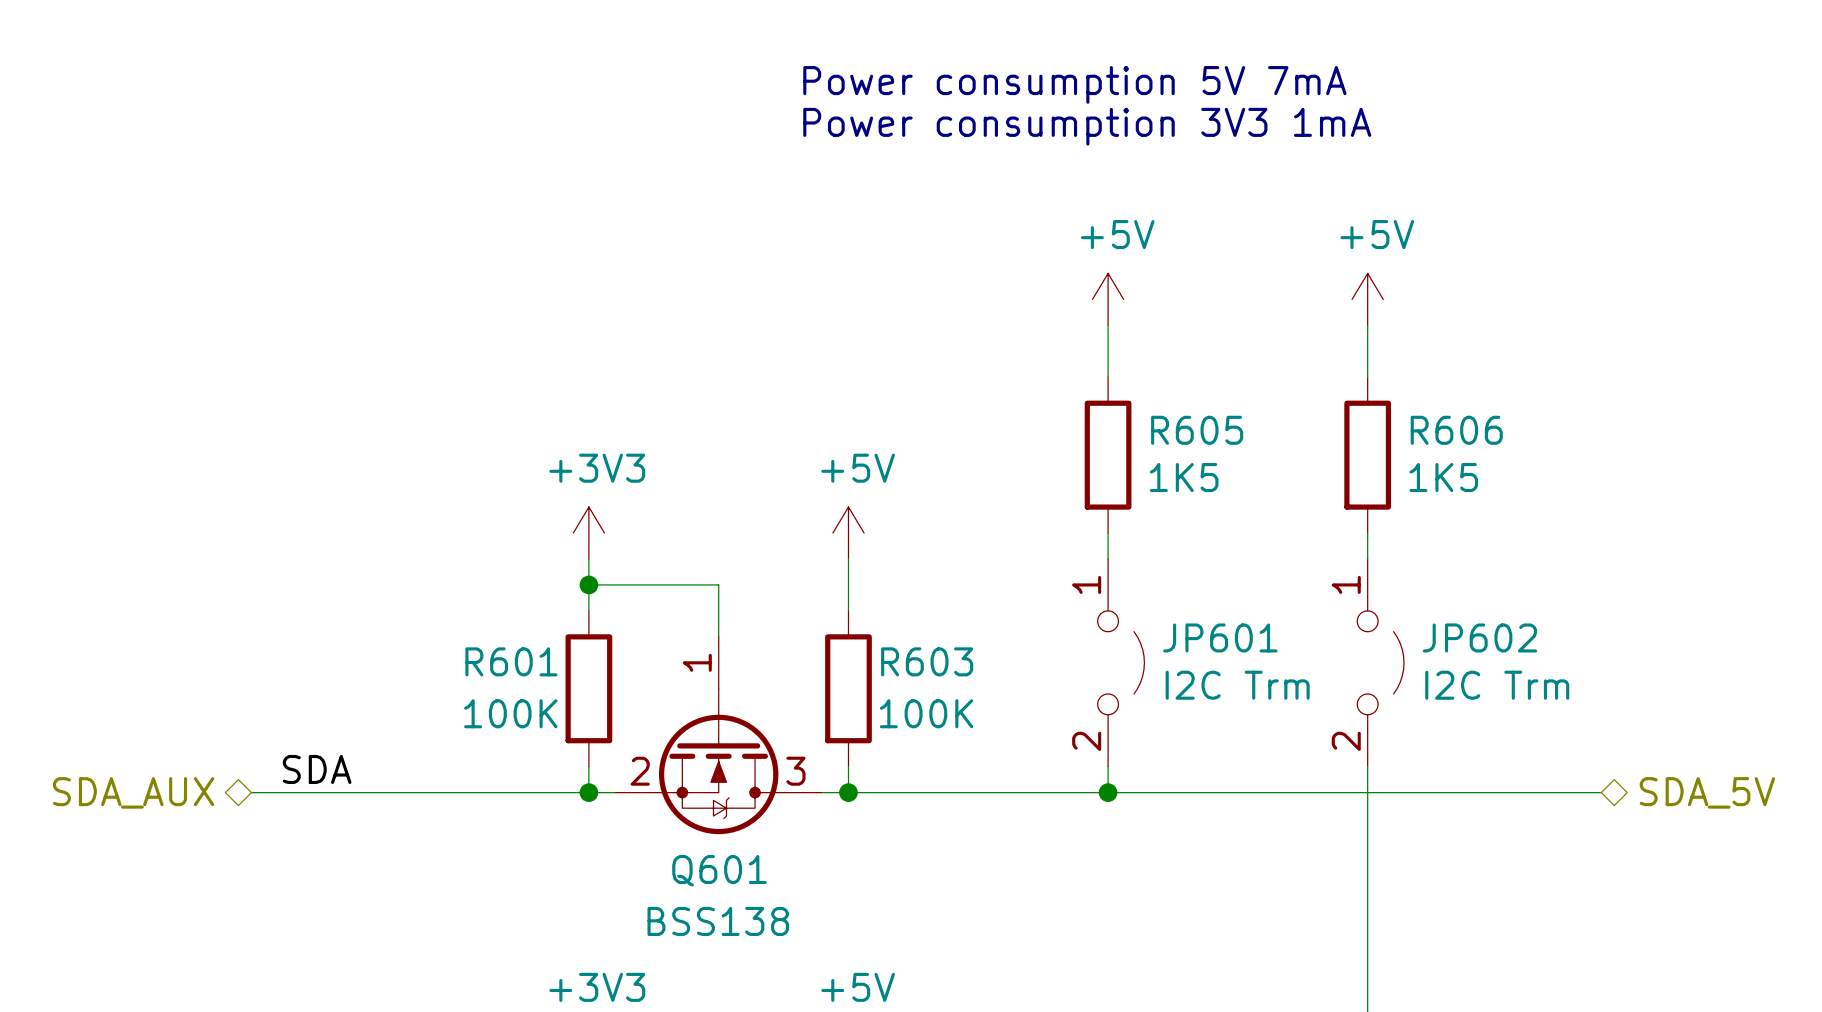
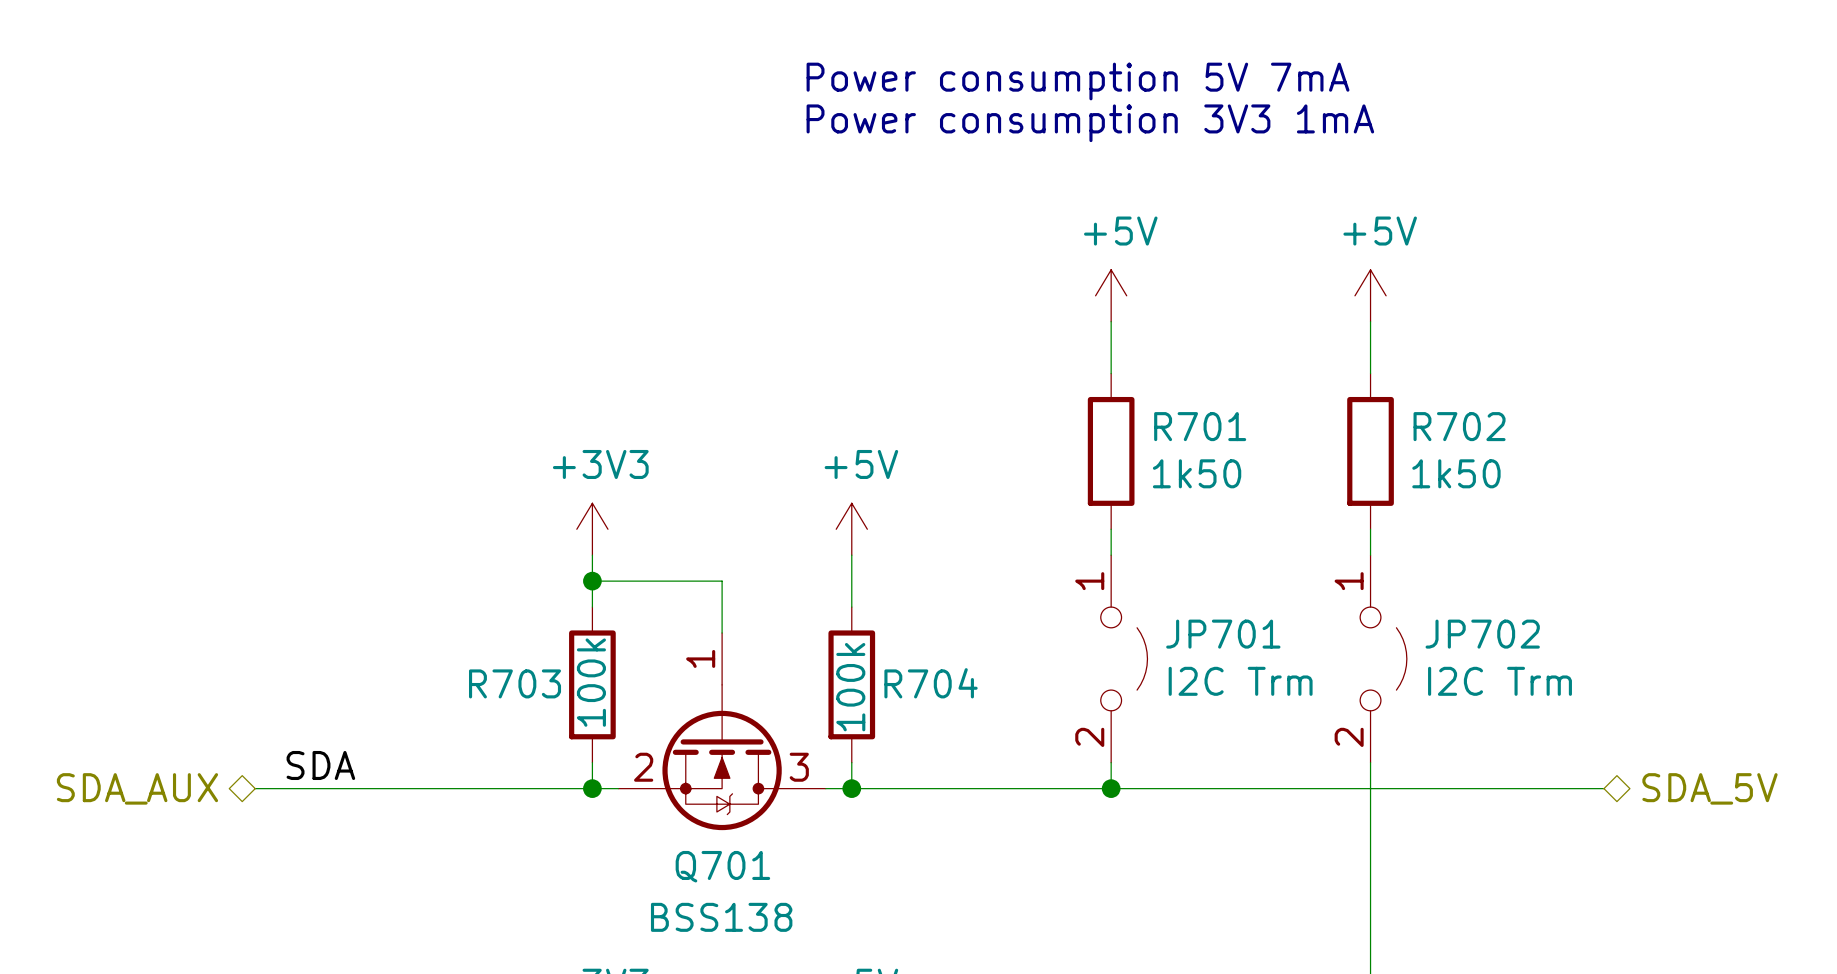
R605 name: R605 (1197, 430) -> R701 (1200, 426)
R606 name: R606 (1456, 430) -> R702 (1459, 426)
R605 value: 1K5 (1184, 477) -> 1k50 (1197, 473)
R606 value: 1K5 (1443, 477) -> 1k50 (1456, 473)
JP601 name: JP601 (1220, 637) -> JP701 (1223, 634)
JP602 name: JP602 (1479, 637) -> JP702 (1482, 634)
R601 name: R601 (511, 661) -> R703 (515, 683)
R603 name: R603 (927, 661) -> R704 (931, 683)
R601 value: 100K (510, 713) -> 100k (591, 682)
R603 value: 100K (926, 713) -> 100k (850, 687)
Q601 name: Q601 (719, 870) -> Q701 (722, 866)

